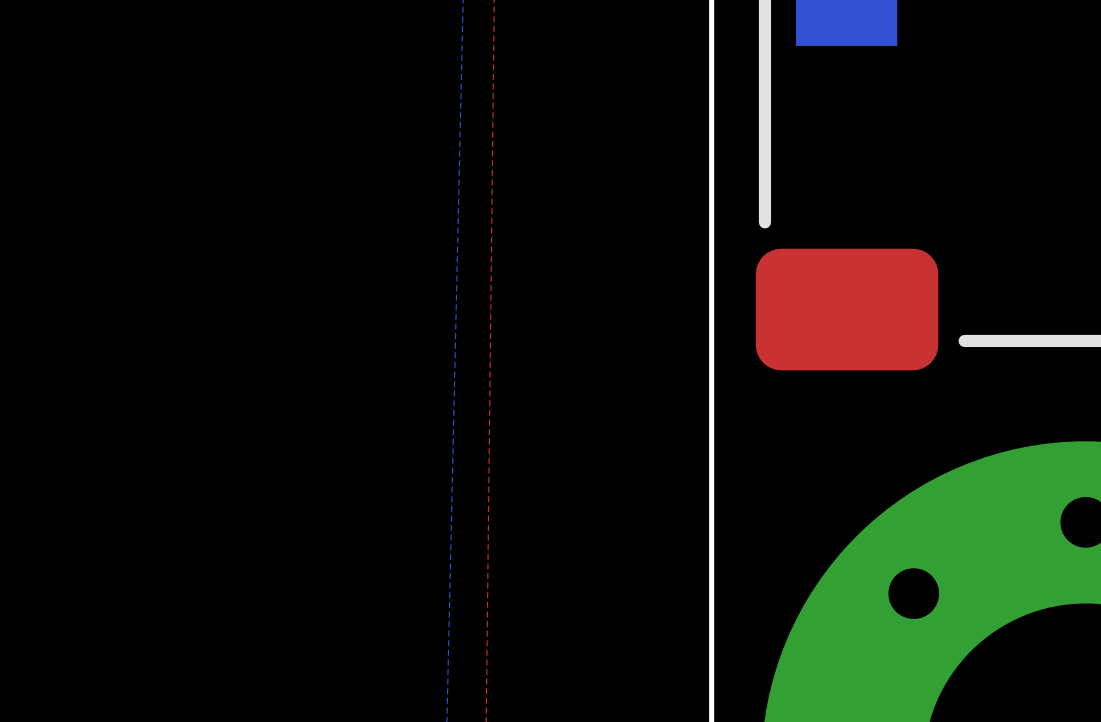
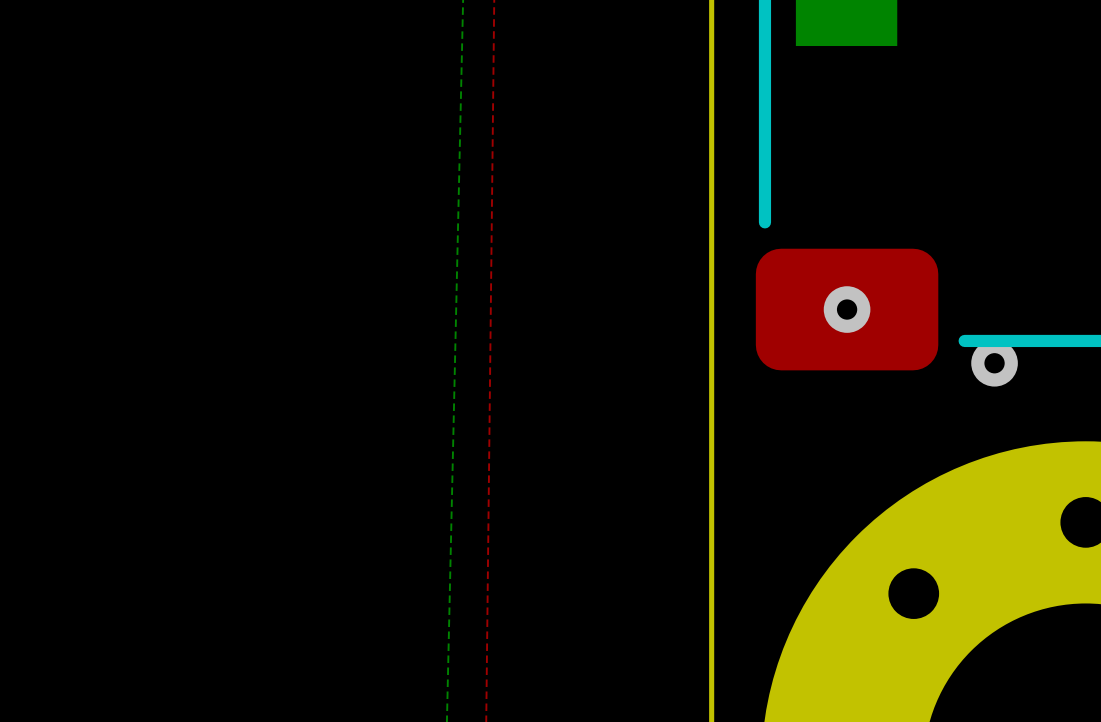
via: none -> (847, 309)
via: none -> (994, 363)

